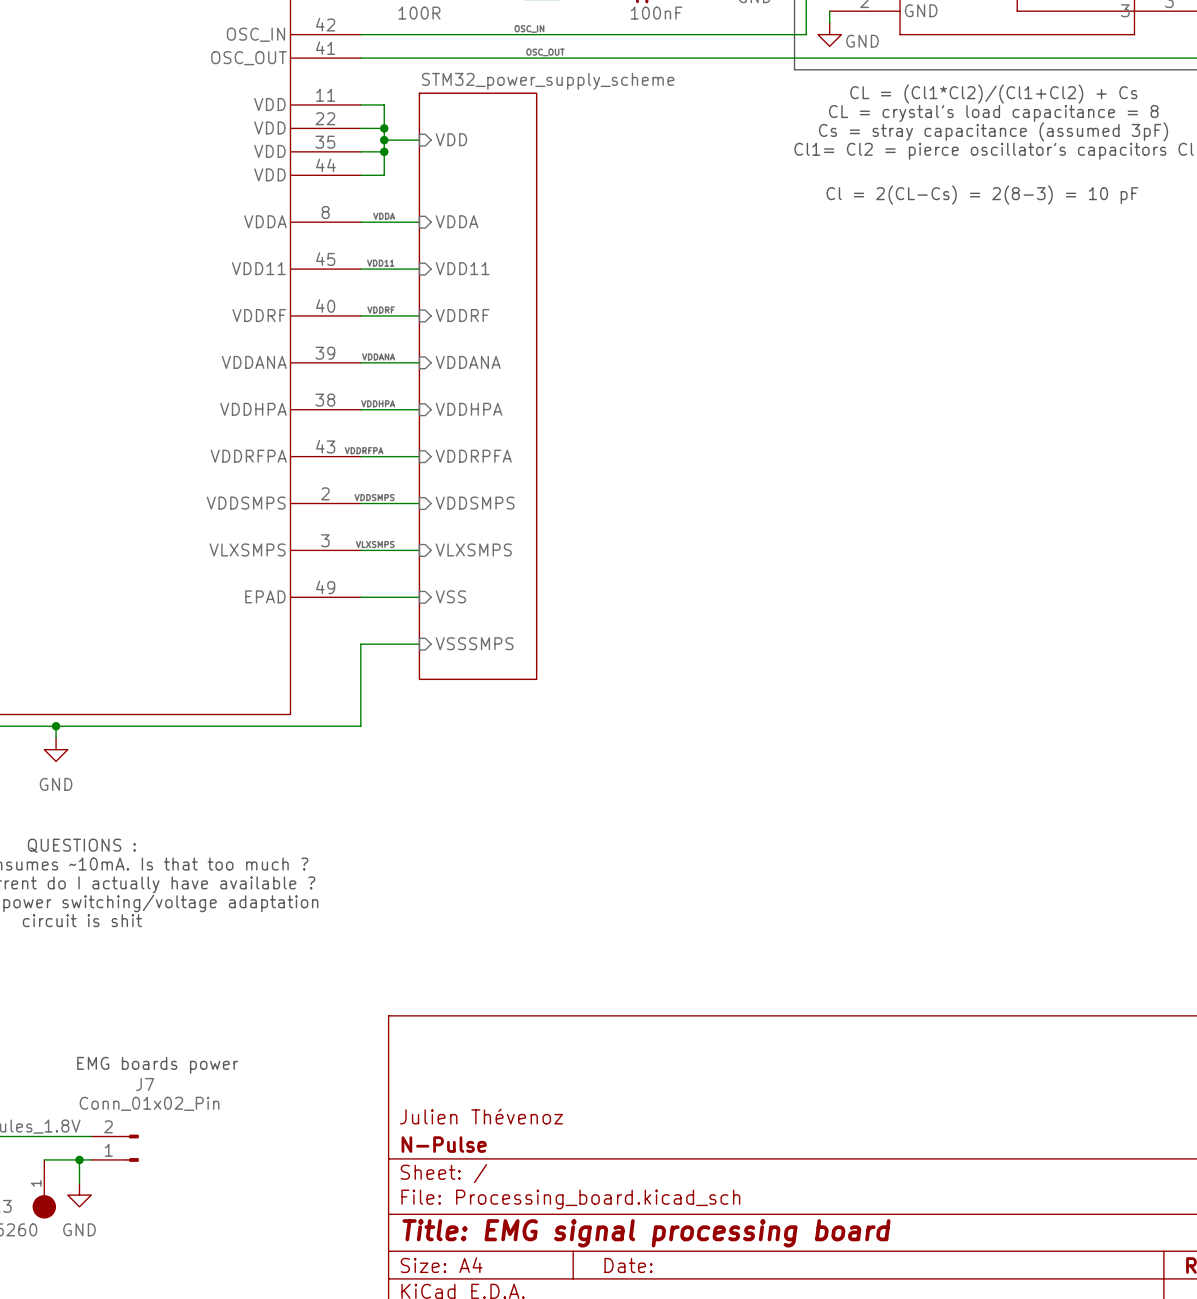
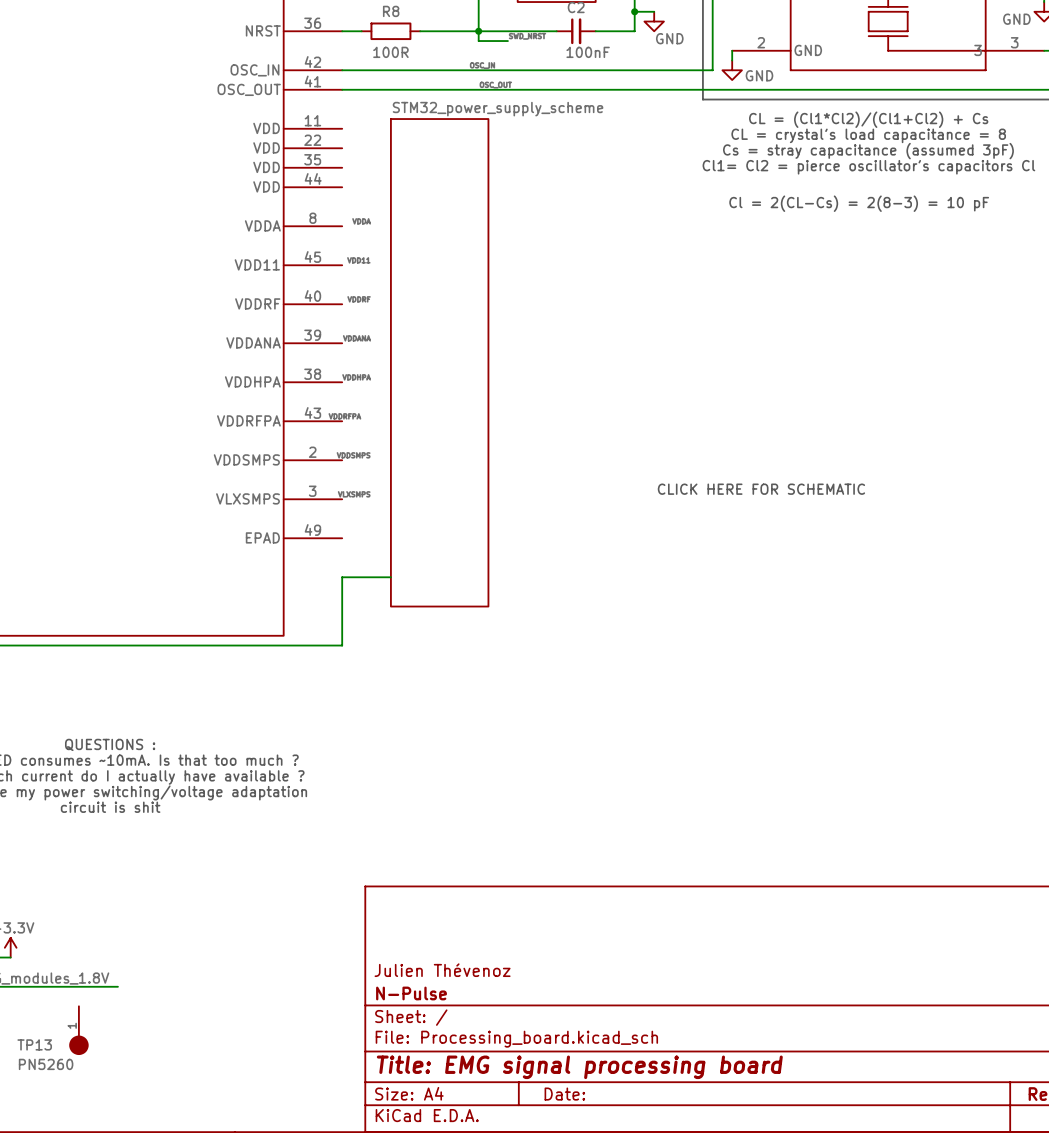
wire: (360, 104) (384, 104) (384, 175) (360, 175) -> none
wire: (360, 128) (384, 128) -> none
junction: (384, 128) -> none
sheet pin: VDD (451, 139) -> none
wire: (384, 140) (419, 140) -> none
junction: (384, 140) -> none
wire: (360, 151) (384, 151) -> none
junction: (384, 151) -> none
sheet pin: VDDA (457, 221) -> none
wire: (360, 222) (419, 222) -> none
sheet pin: VDD11 (462, 268) -> none
wire: (360, 269) (419, 269) -> none
wire: (360, 315) (419, 315) -> none
sheet pin: VDDRF (462, 315) -> none
wire: (360, 362) (419, 362) -> none
sheet pin: VDDANA (468, 362) -> none
wire: (360, 409) (419, 409) -> none
sheet pin: VDDHPA (469, 409) -> none
wire: (360, 456) (419, 456) -> none
sheet pin: VDDRPFA (473, 456) -> none
wire: (360, 503) (419, 503) -> none
sheet pin: VDDSMPS (475, 503) -> none
text: none -> CLICK HERE FOR SCHEMATIC (761, 489)
sheet pin: VLXSMPS (473, 549) -> none
wire: (360, 550) (419, 550) -> none
sheet pin: VSS (450, 596) -> none
wire: (360, 597) (419, 597) -> none
sheet pin: VSSSMPS (474, 643) -> none
wire: (56, 726) (56, 737) -> none
junction: (56, 726) -> none
power symbol: GND (56, 749) -> none
text: EMG boards power (157, 1065) -> none
J7: Conn_01x02_Pin (115, 1148) -> none
wire: (44, 1159) (91, 1159) -> none
wire: (79, 1159) (79, 1183) -> none
junction: (79, 1159) -> none
power symbol: GND (79, 1195) -> none

